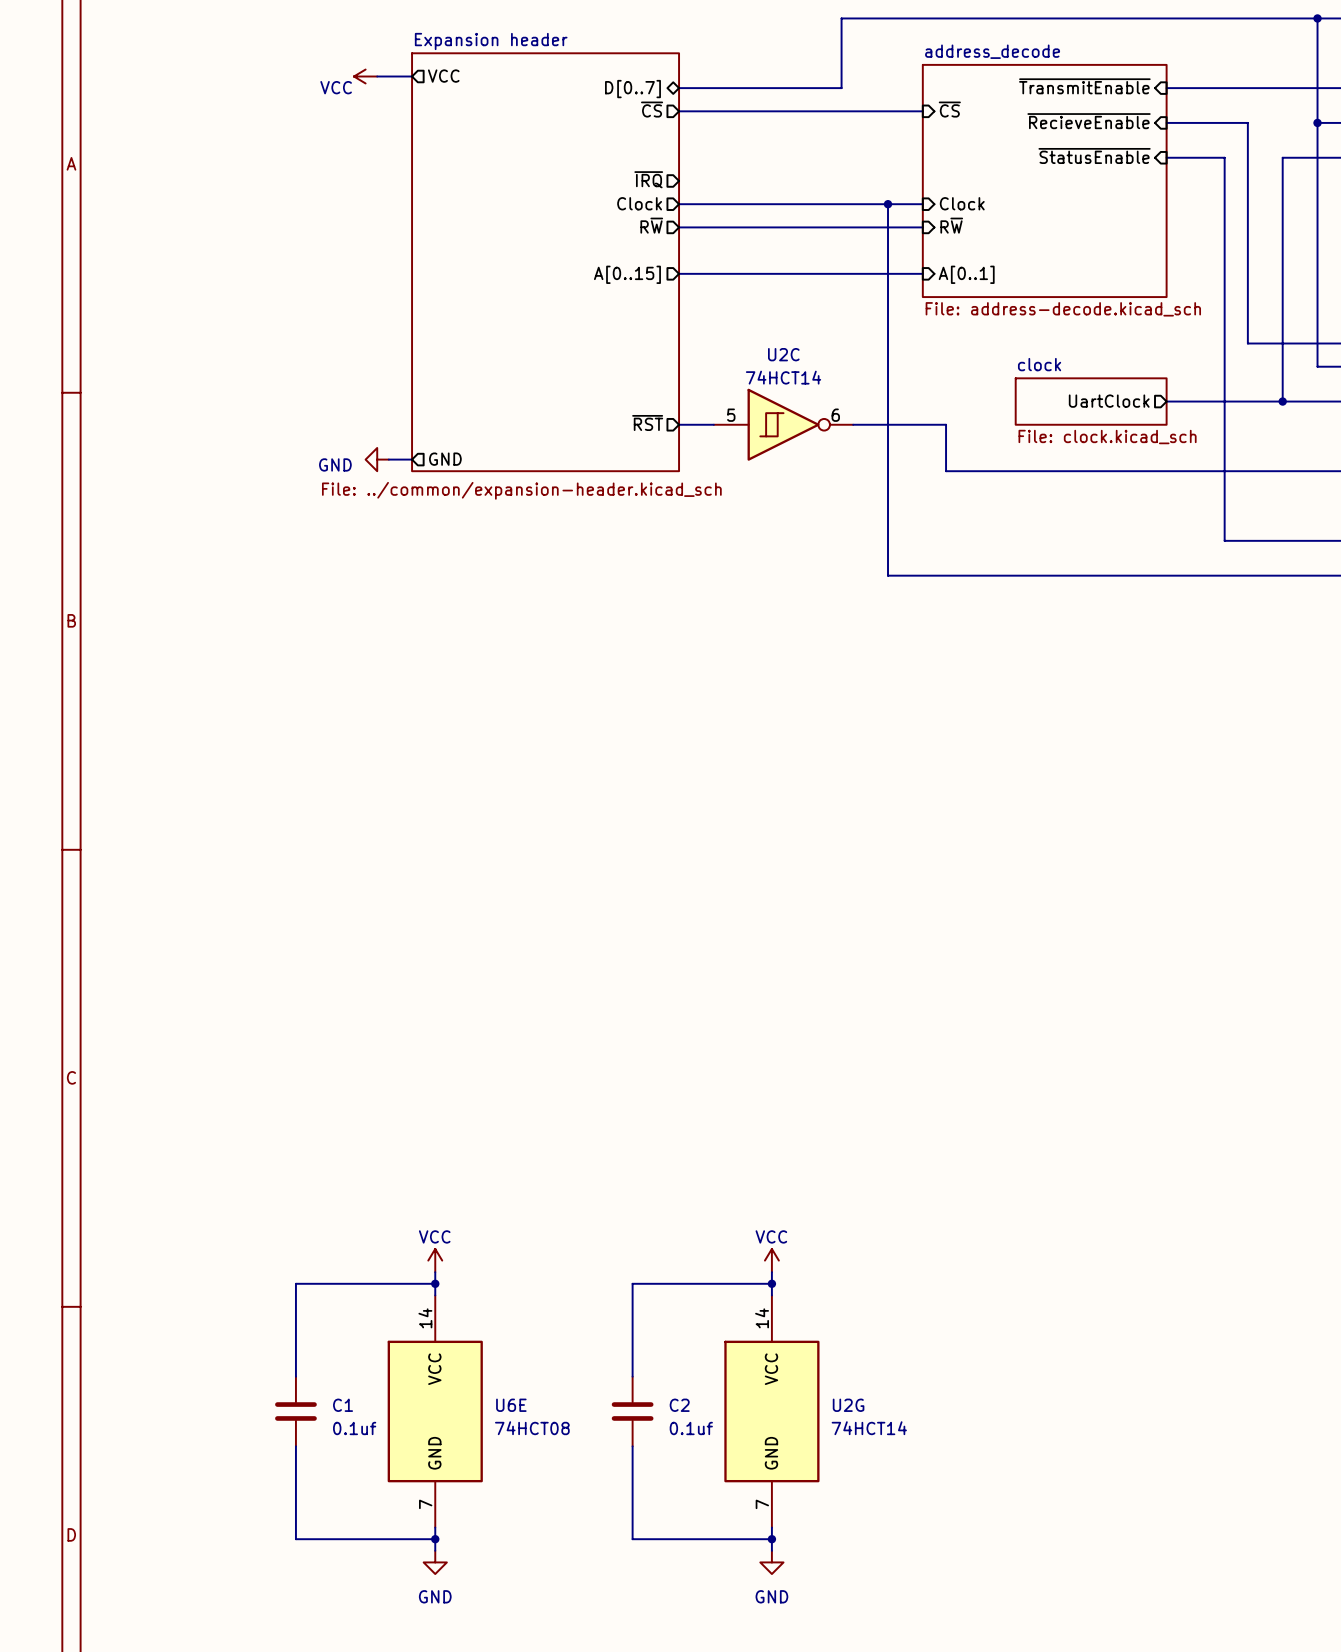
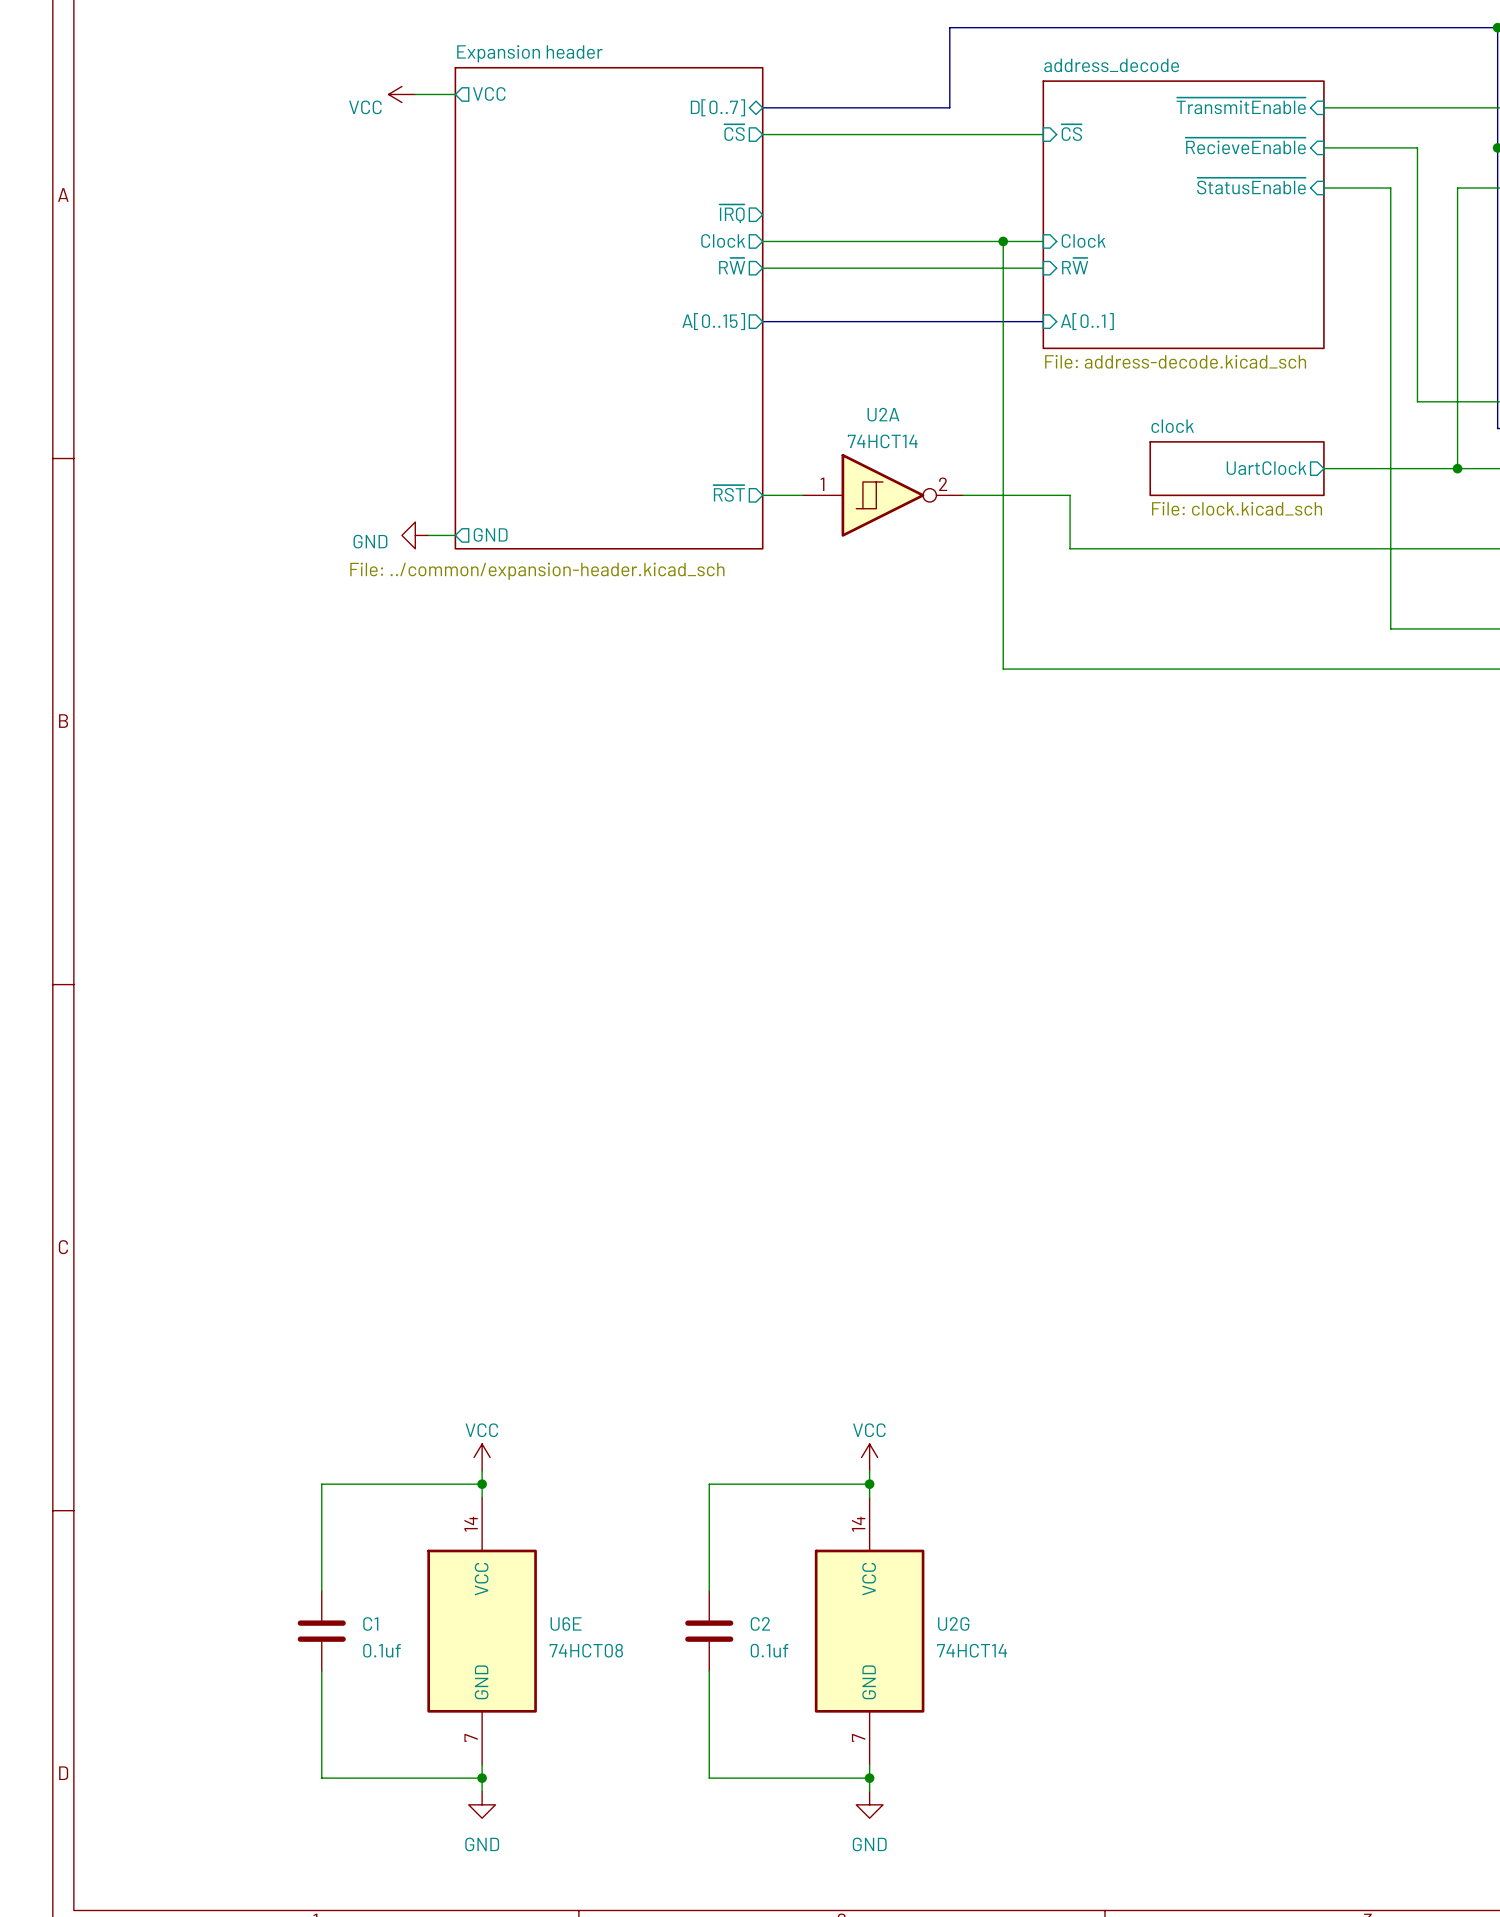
U2C name: U2C (783, 354) -> U2A (883, 414)
U2C pin number: 5 (731, 415) -> 1 (822, 484)
U2C pin number: 6 (835, 415) -> 2 (943, 484)

